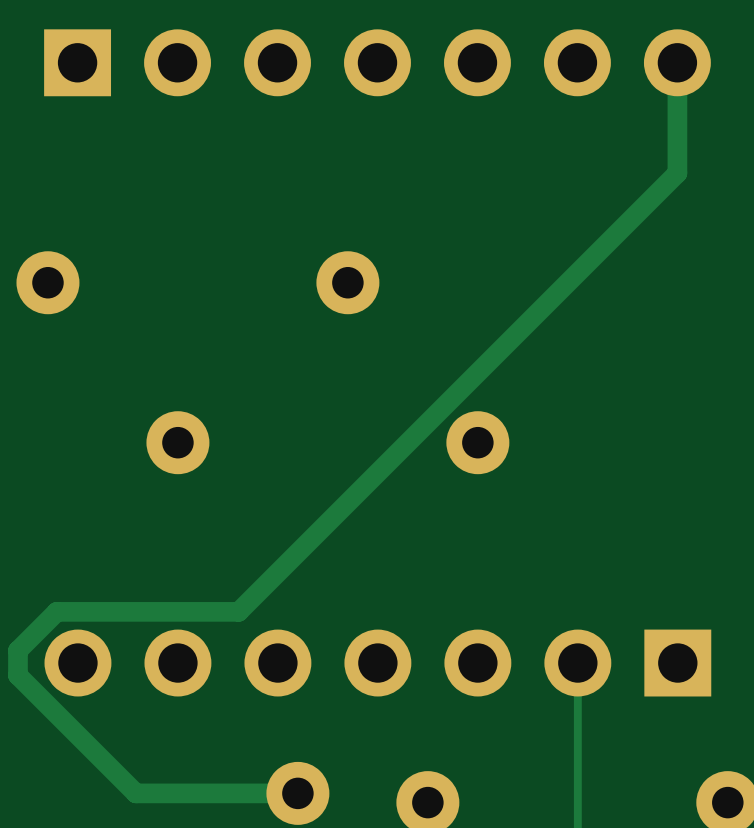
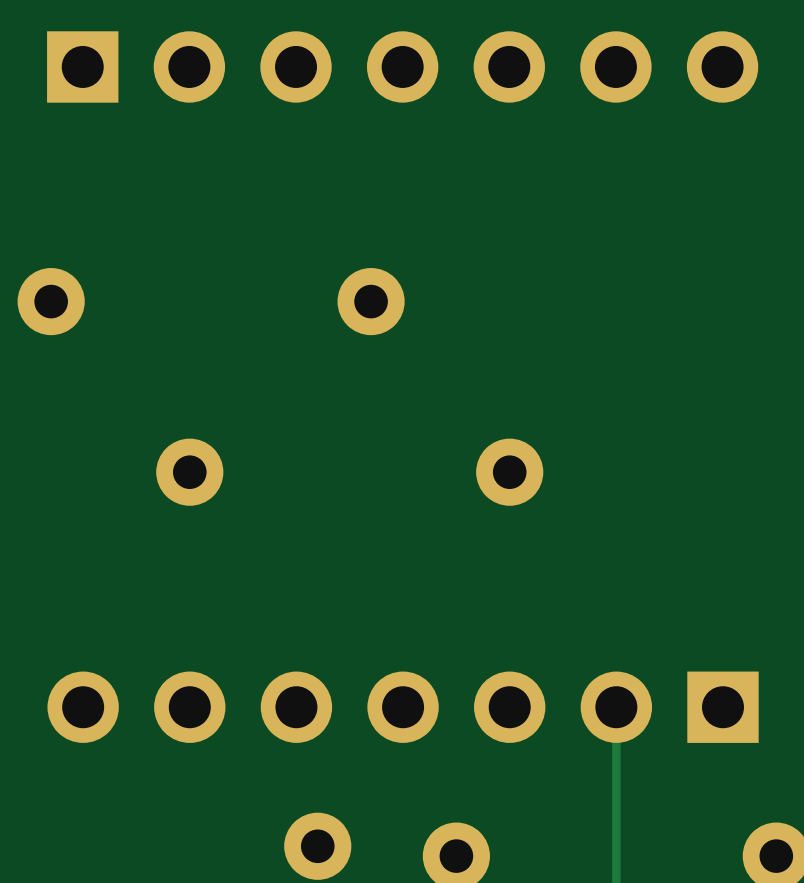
track: (677, 62) (677, 173) (238, 611) (56, 611) (17, 650) (17, 675) (135, 793) (297, 793) -> none

